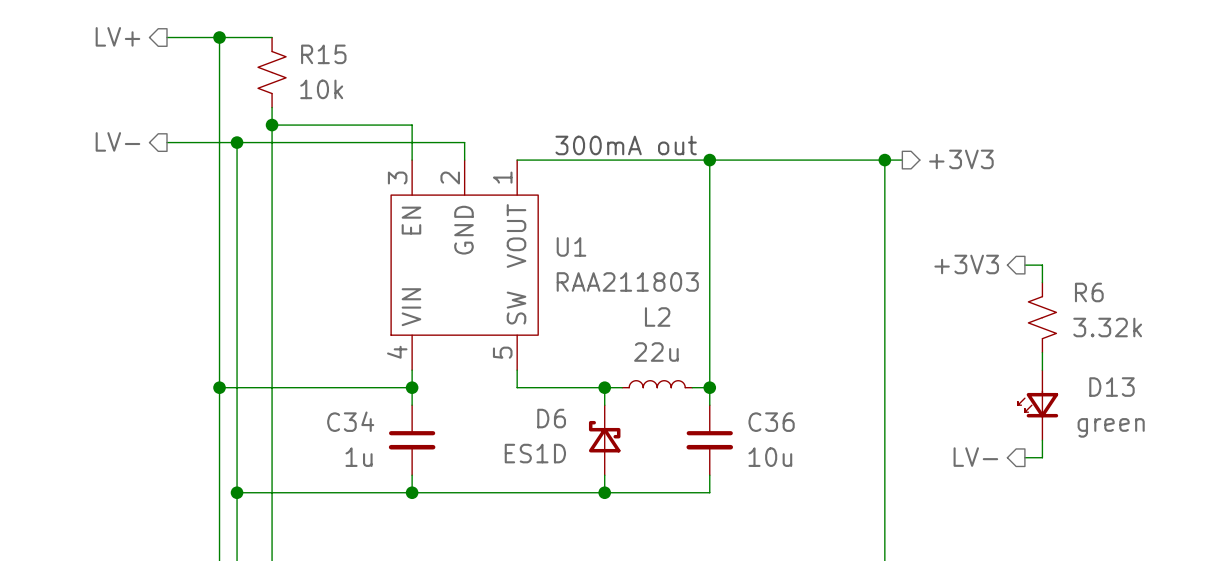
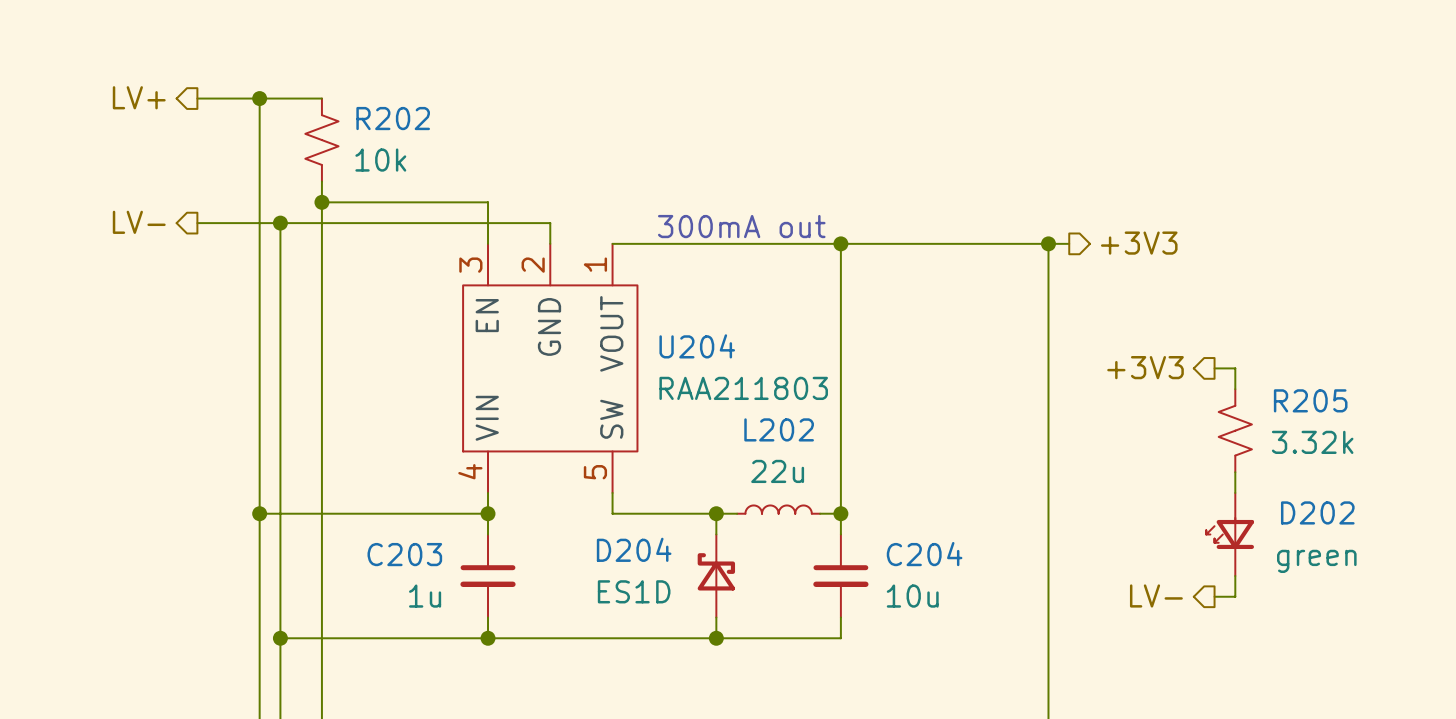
R15 name: R15 (323, 54) -> R202 (393, 118)
U1 name: U1 (571, 246) -> U204 (697, 346)
R6 name: R6 (1089, 292) -> R205 (1310, 400)
L2 name: L2 (657, 317) -> L202 (779, 429)
D13 name: D13 (1111, 387) -> D202 (1317, 512)
D6 name: D6 (551, 418) -> D204 (634, 549)
C34 name: C34 (350, 421) -> C203 (404, 554)
C36 name: C36 (771, 422) -> C204 (924, 554)

